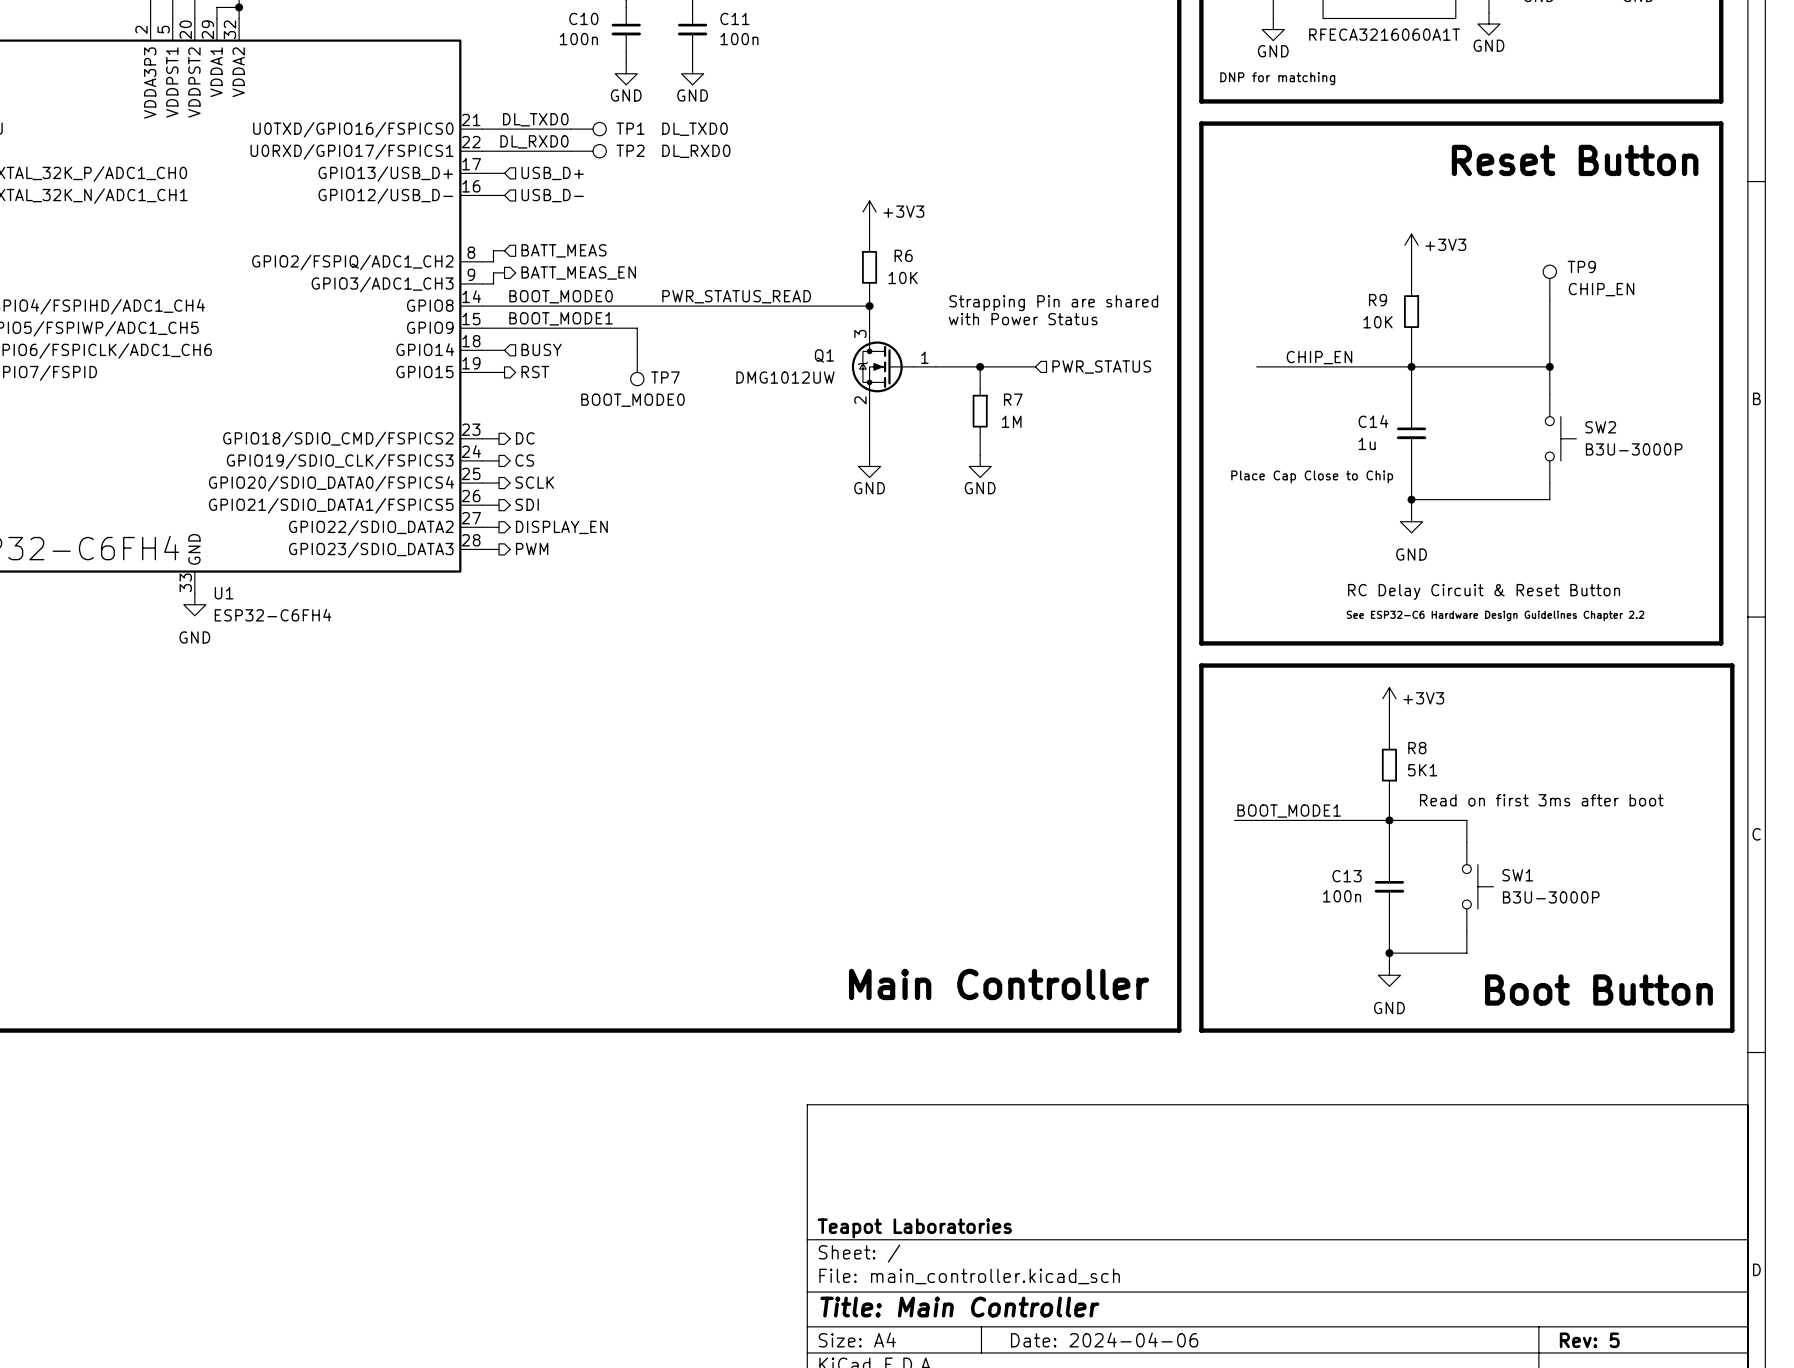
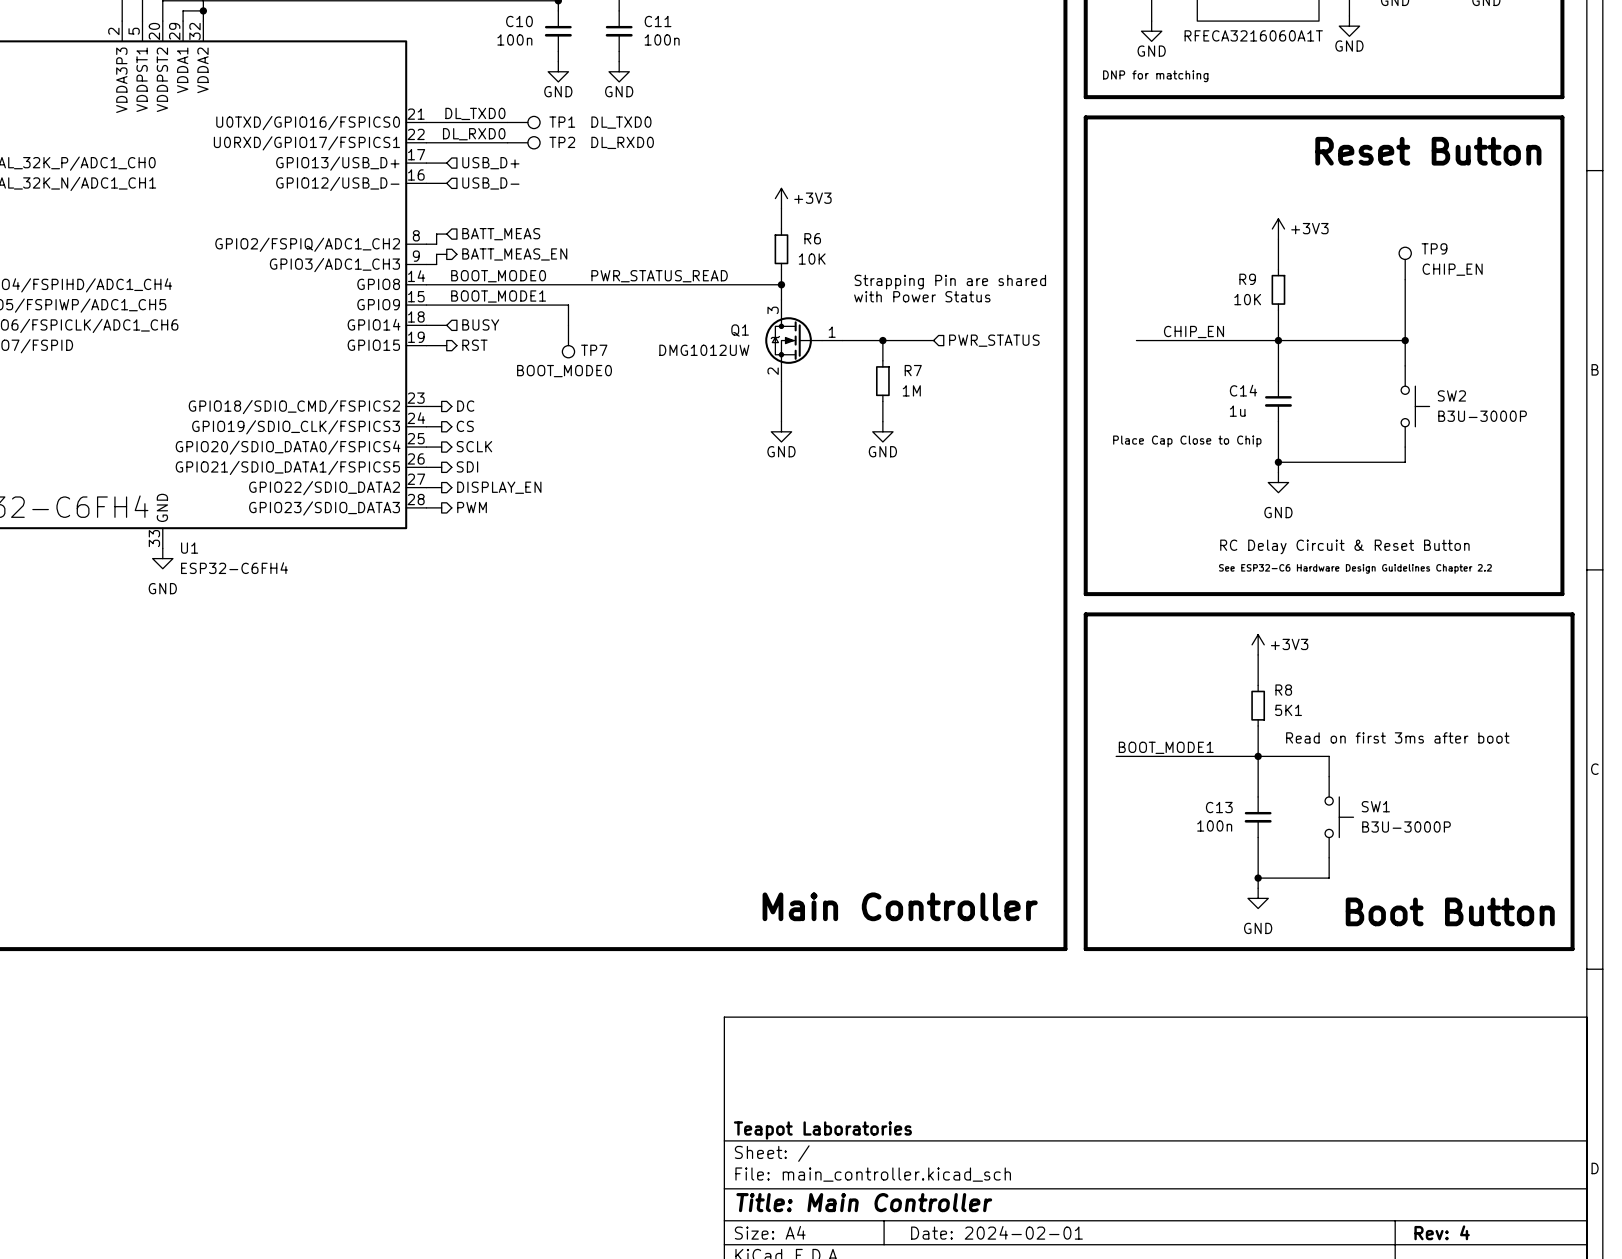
title block: Date: 2024-04-06 (1104, 1339) -> Date: 2024-02-01 (996, 1232)
title block: Rev: 5 (1589, 1340) -> Rev: 4 (1442, 1232)

